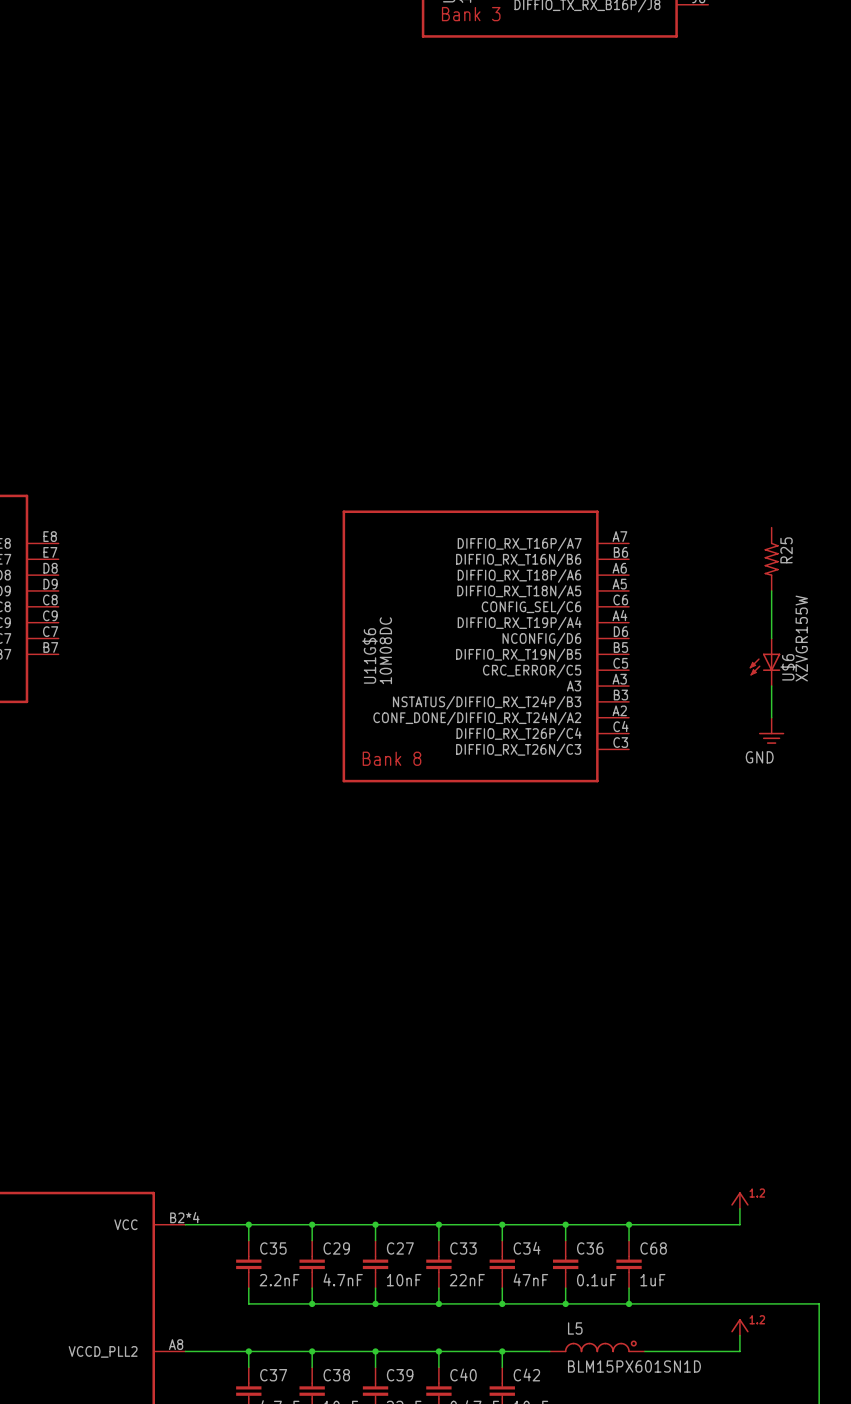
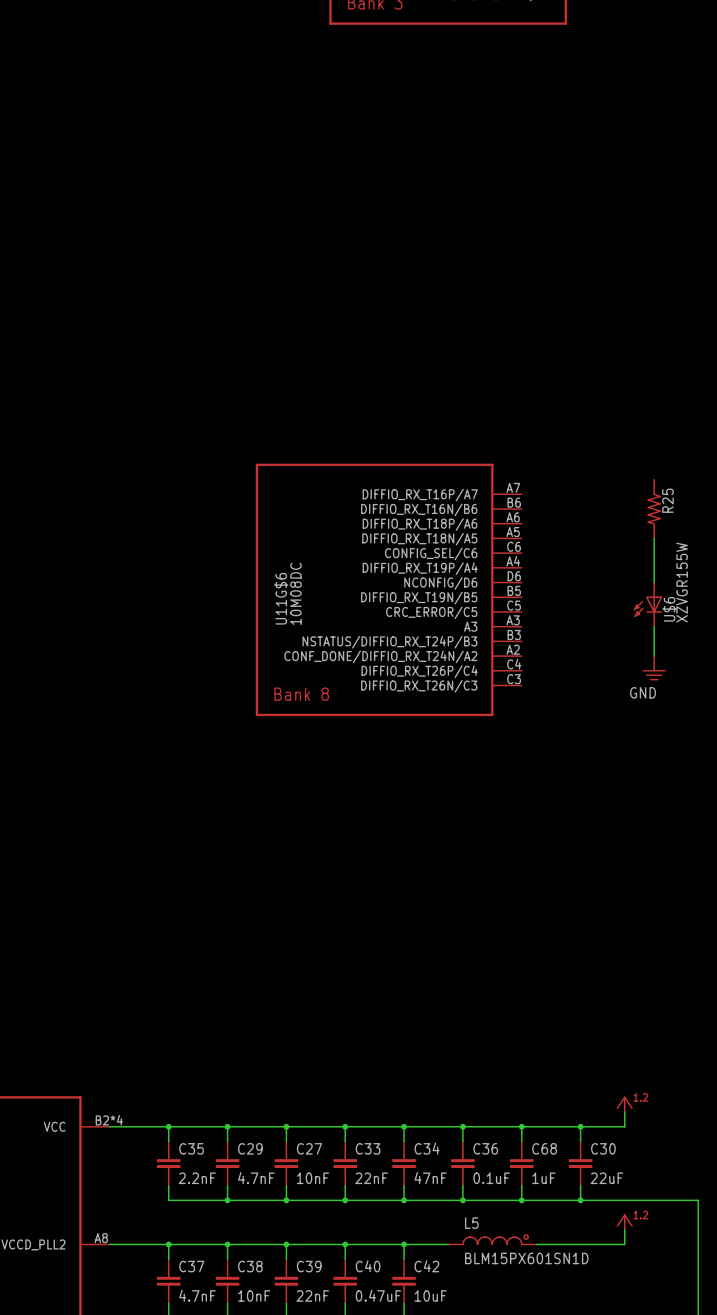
wire: none -> (580, 1126) (580, 1141)
junction: none -> (580, 1126)
C30: none -> 22uF (580, 1163)
wire: none -> (580, 1185) (580, 1200)
junction: none -> (580, 1200)

